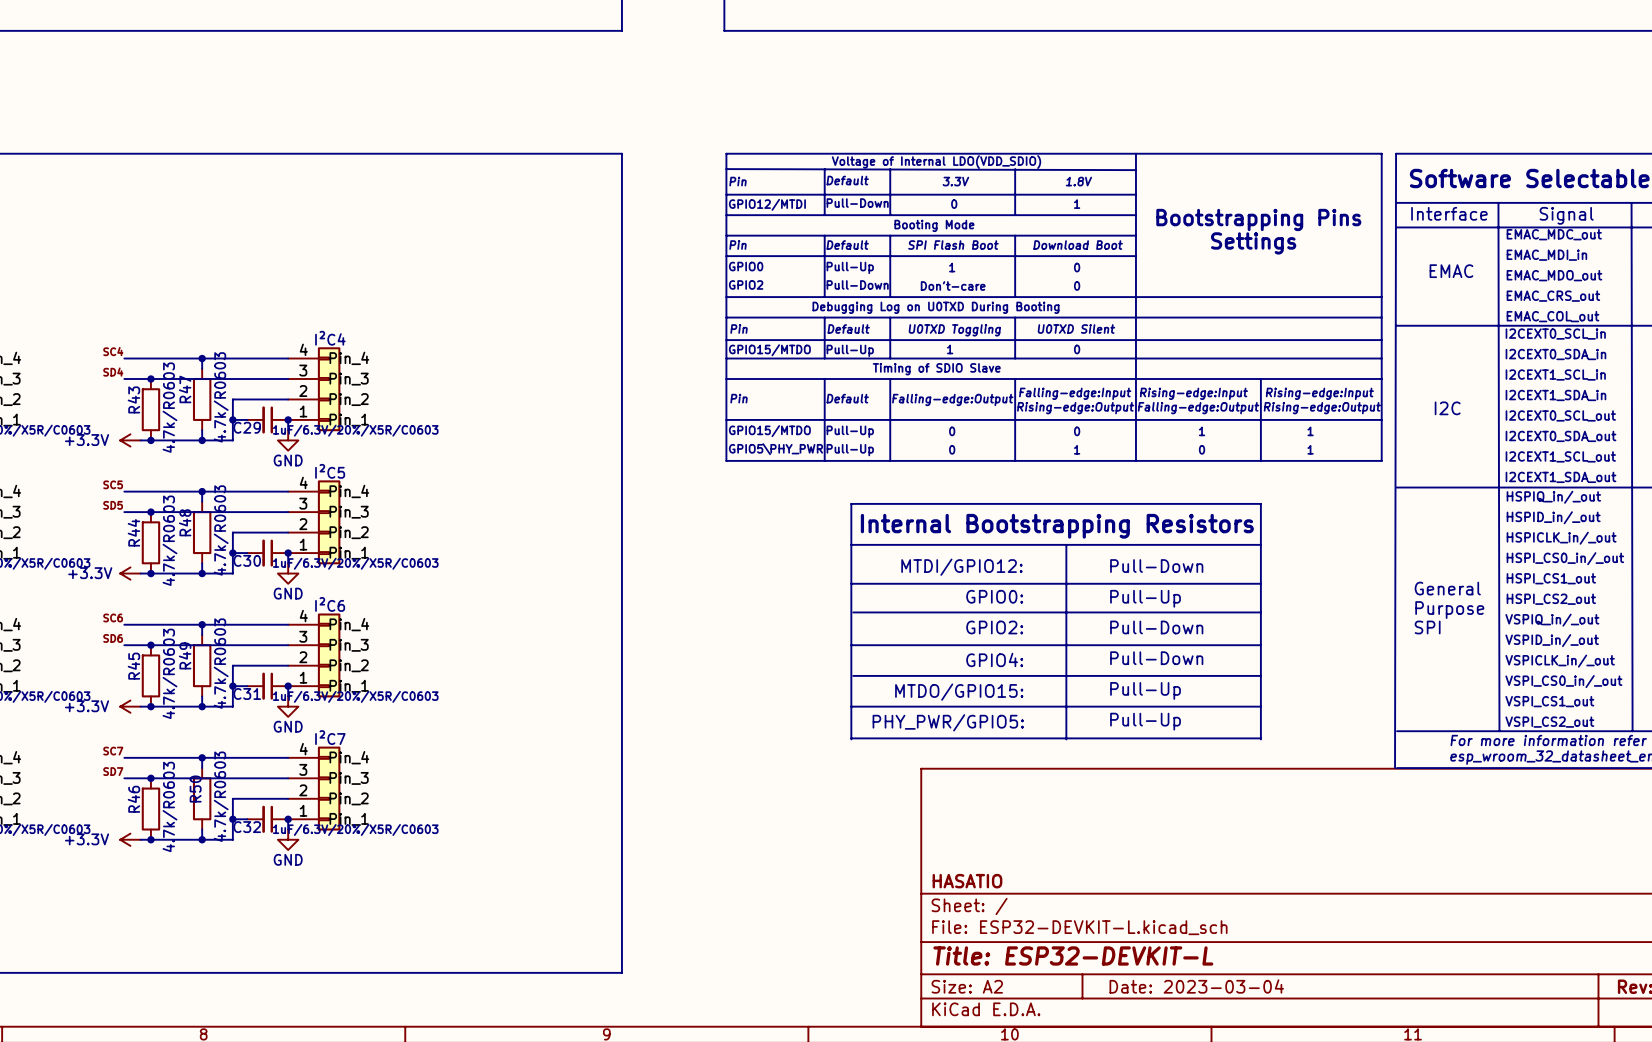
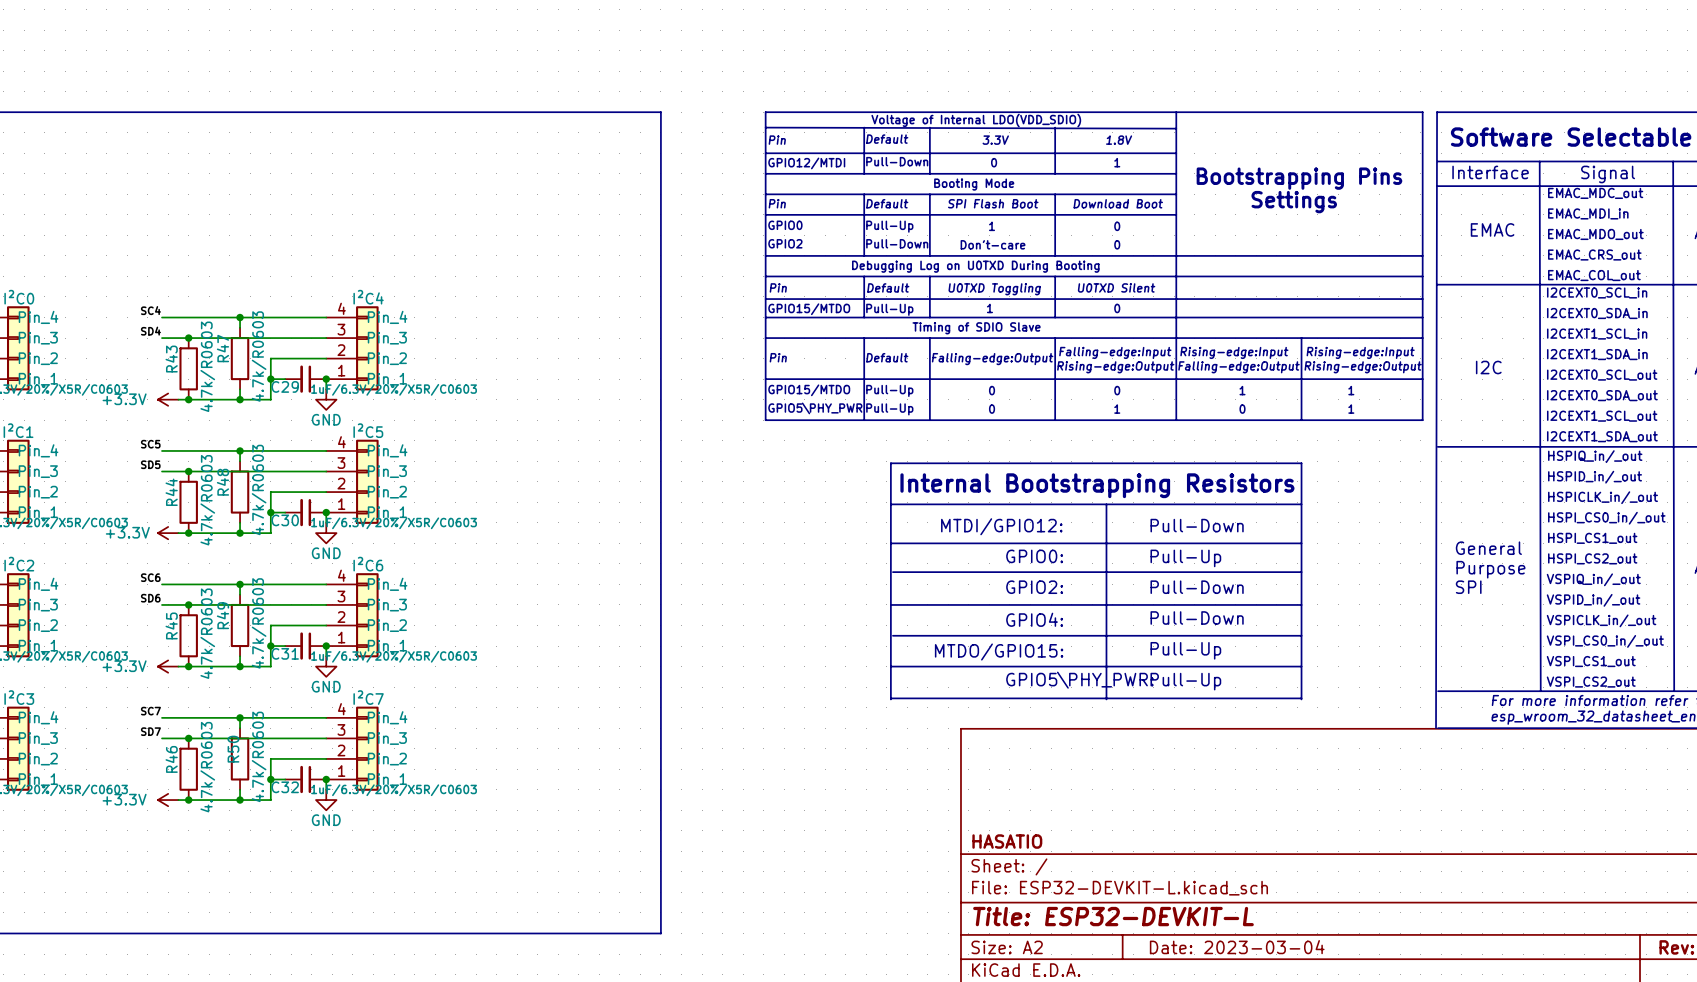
text: none -> GPIO5\PHY_PWR: (1079, 680)
text: PHY_PWR/GPIO5: (948, 722) -> none

